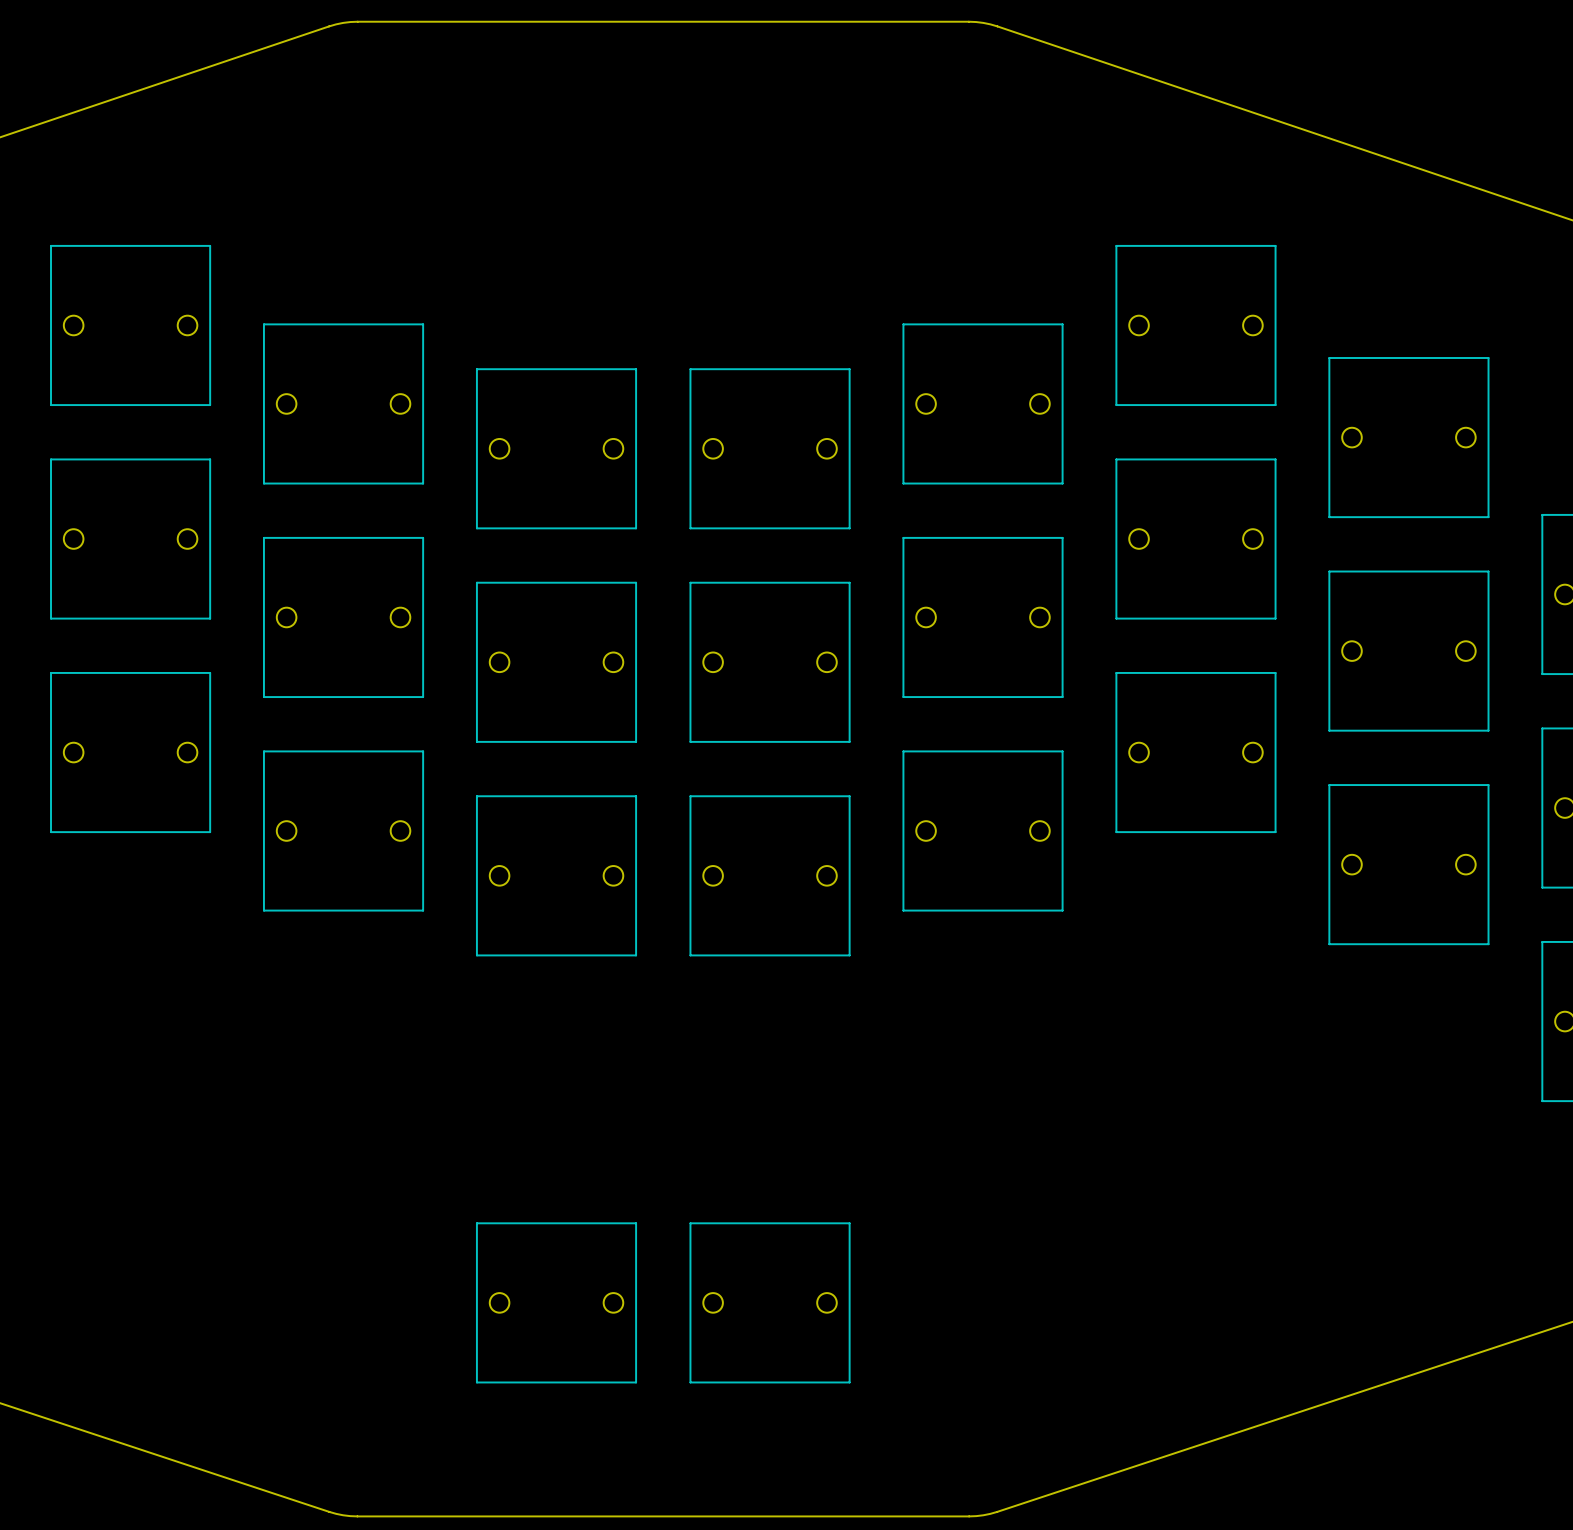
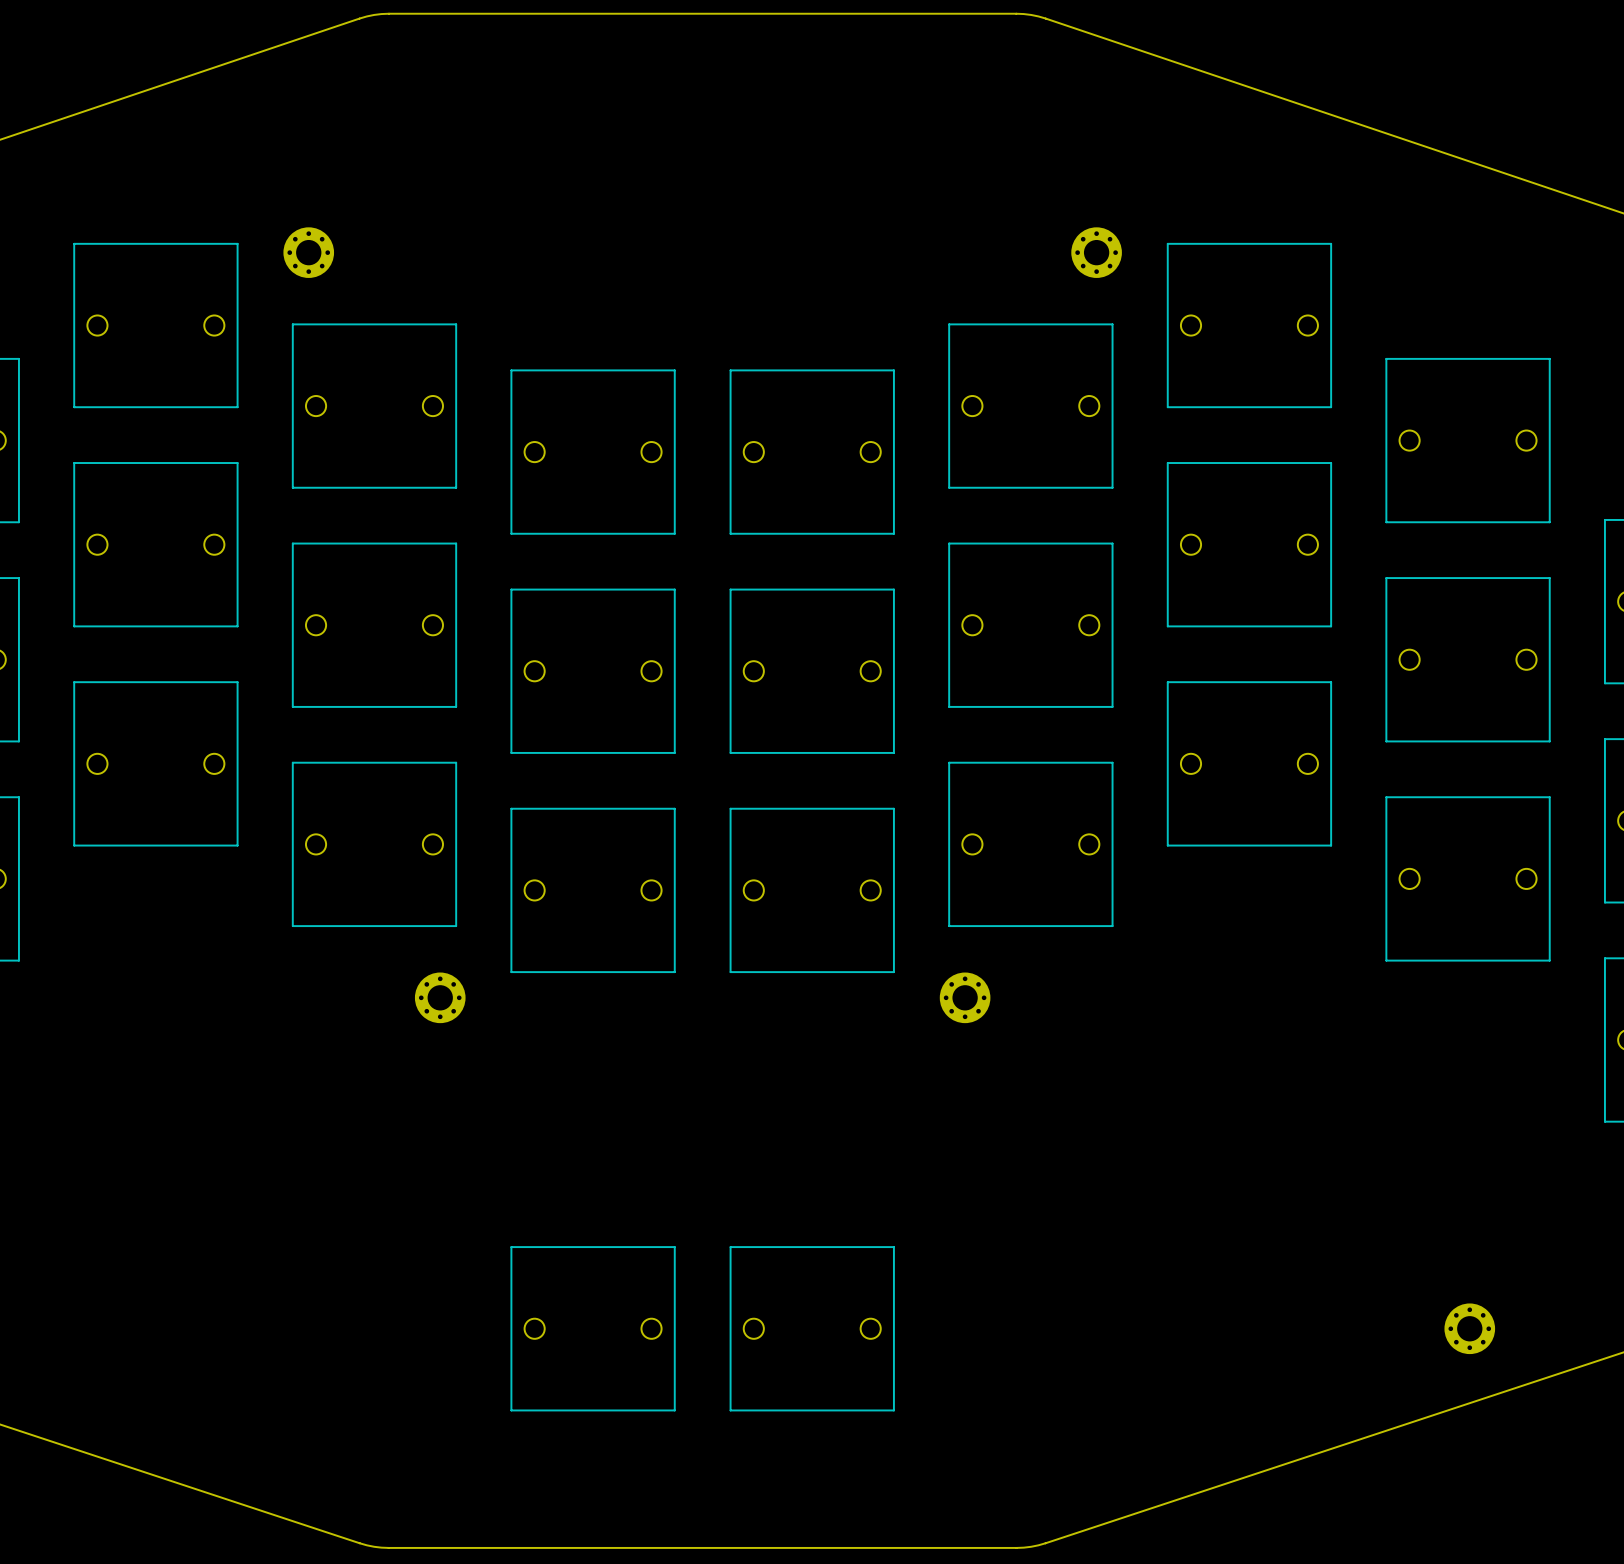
part: none -> (308, 252)
part: none -> (1096, 252)
part: none -> (440, 997)
part: none -> (965, 997)
part: none -> (1469, 1328)

